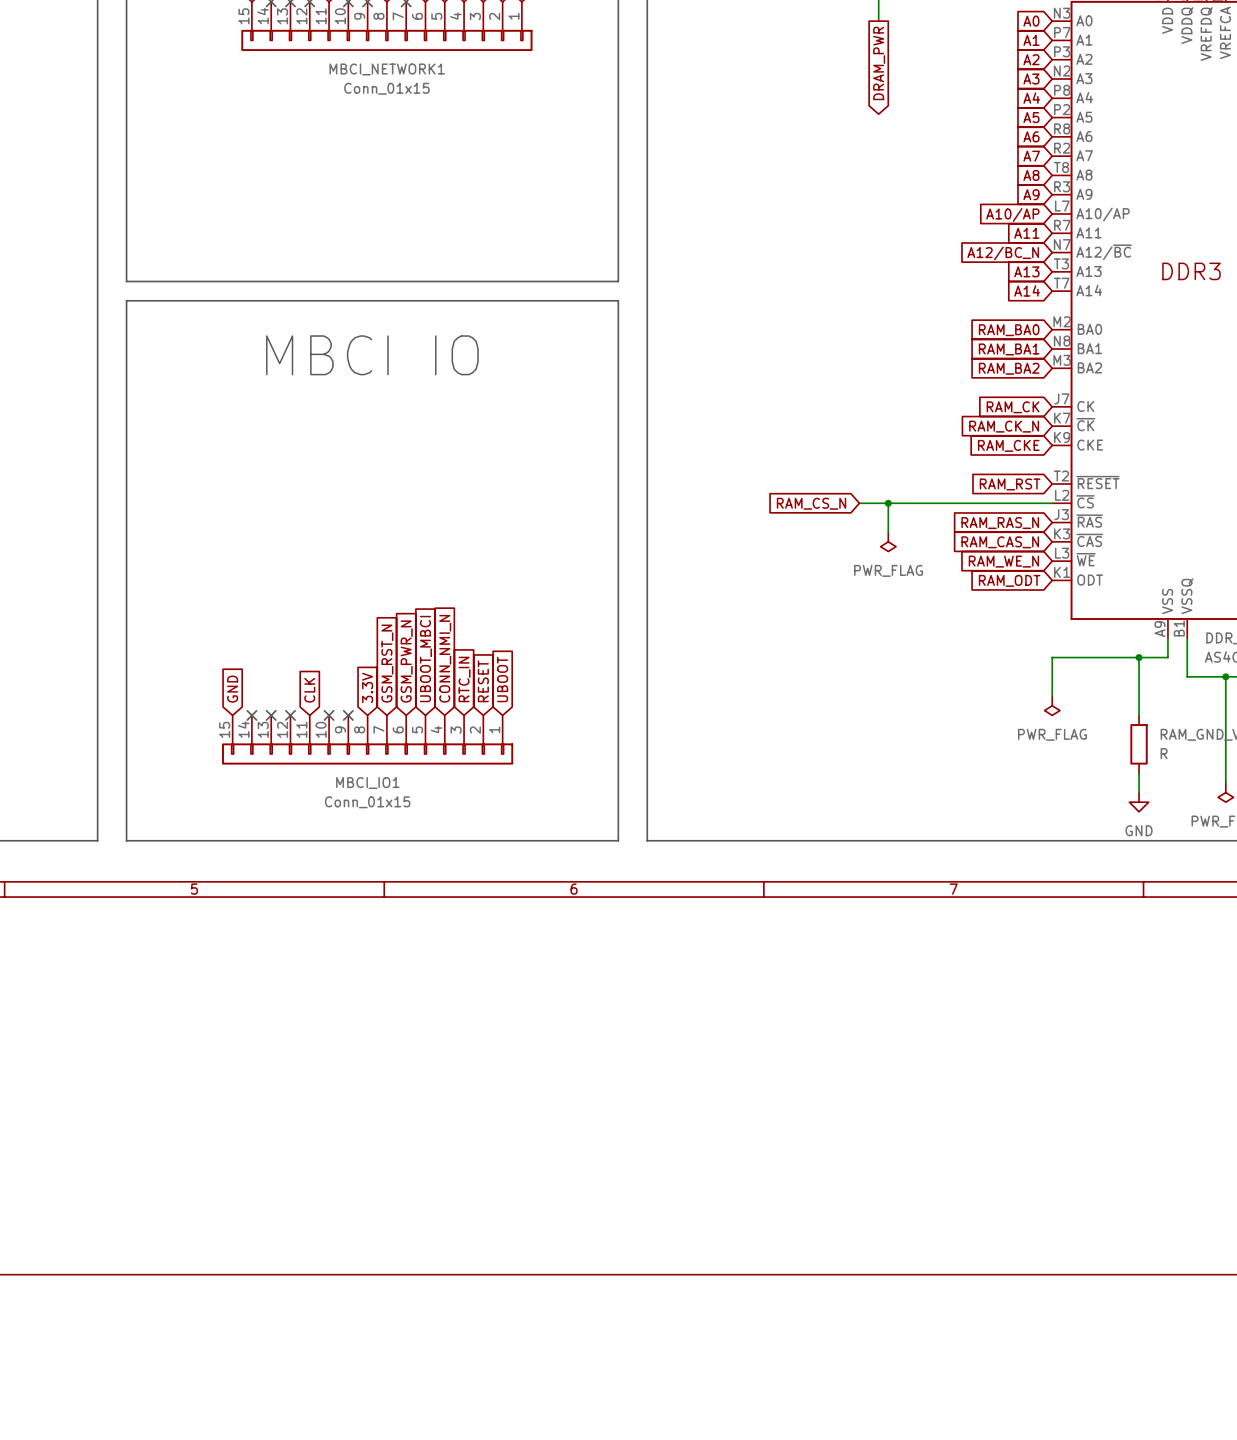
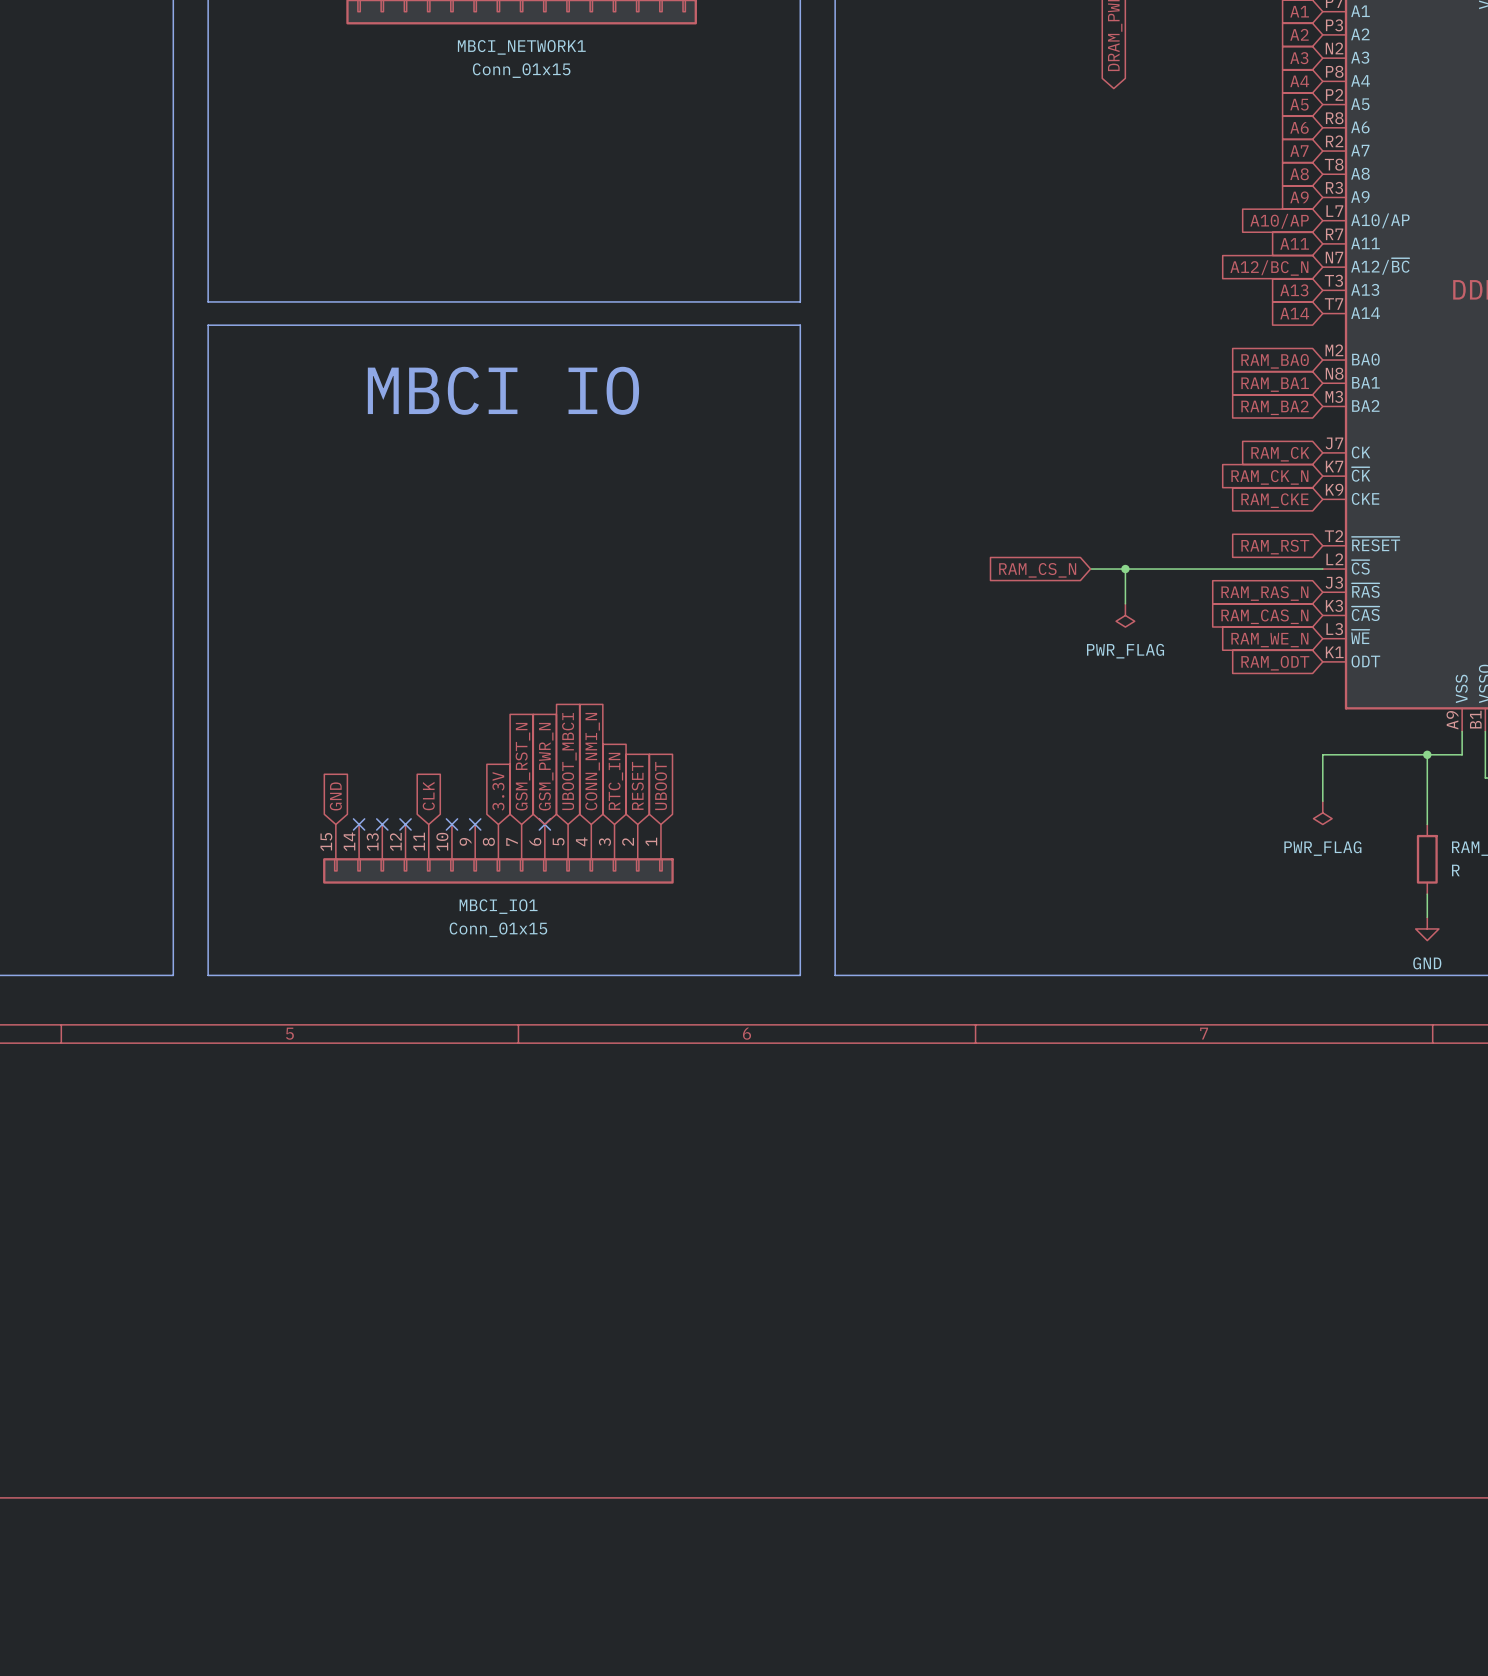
no-connect mark: none -> (544, 824)

